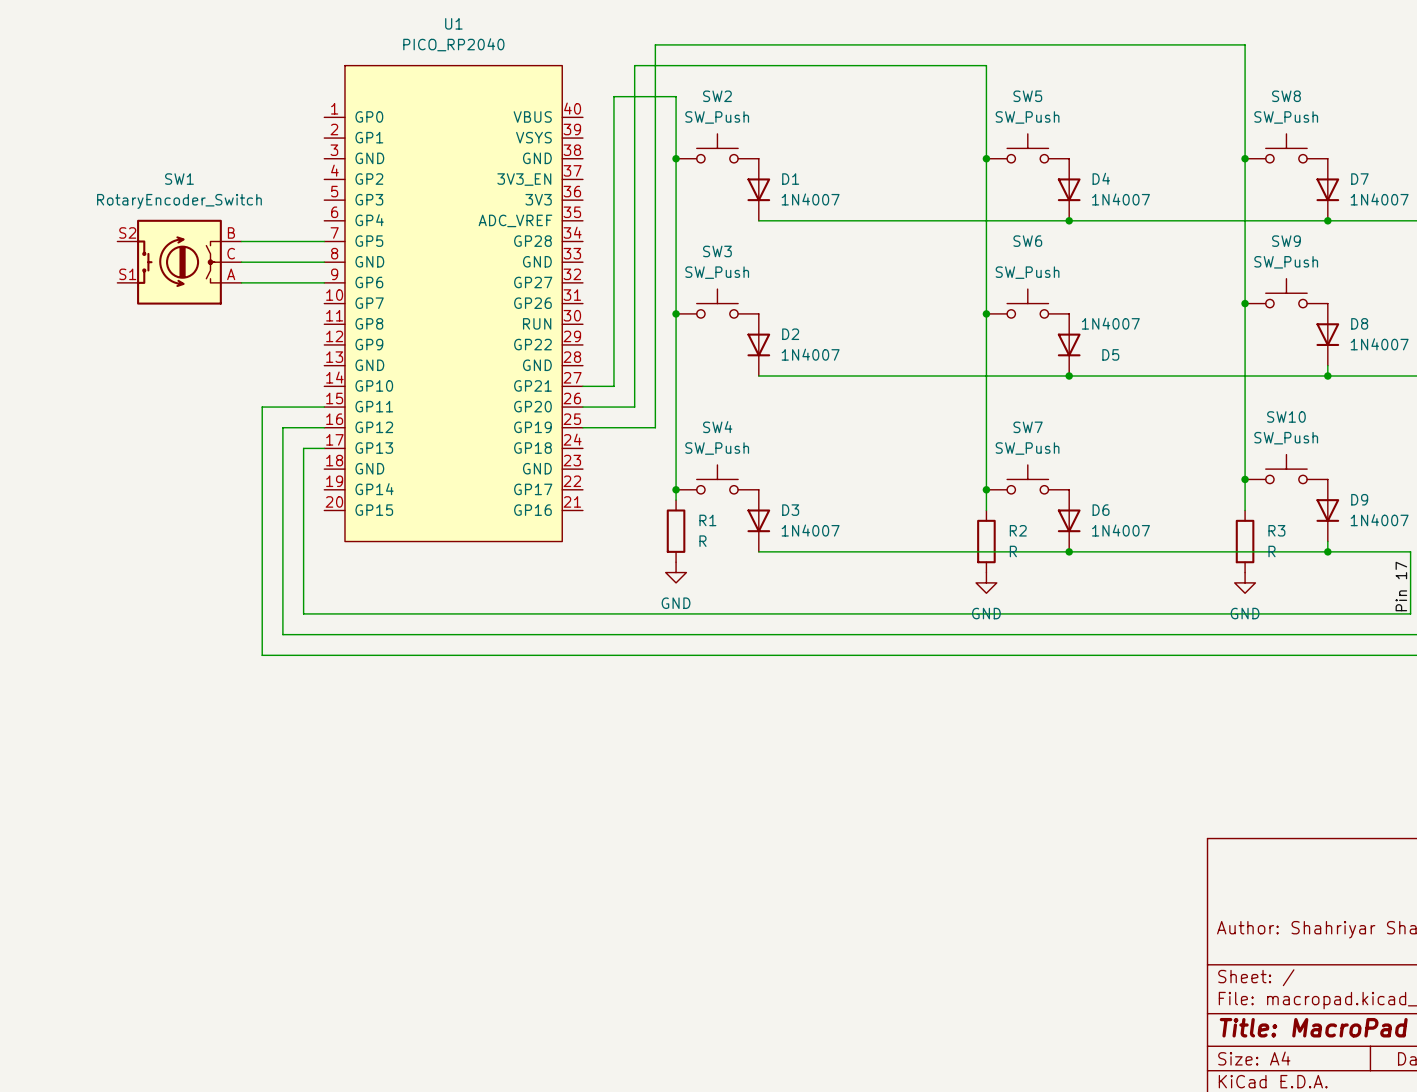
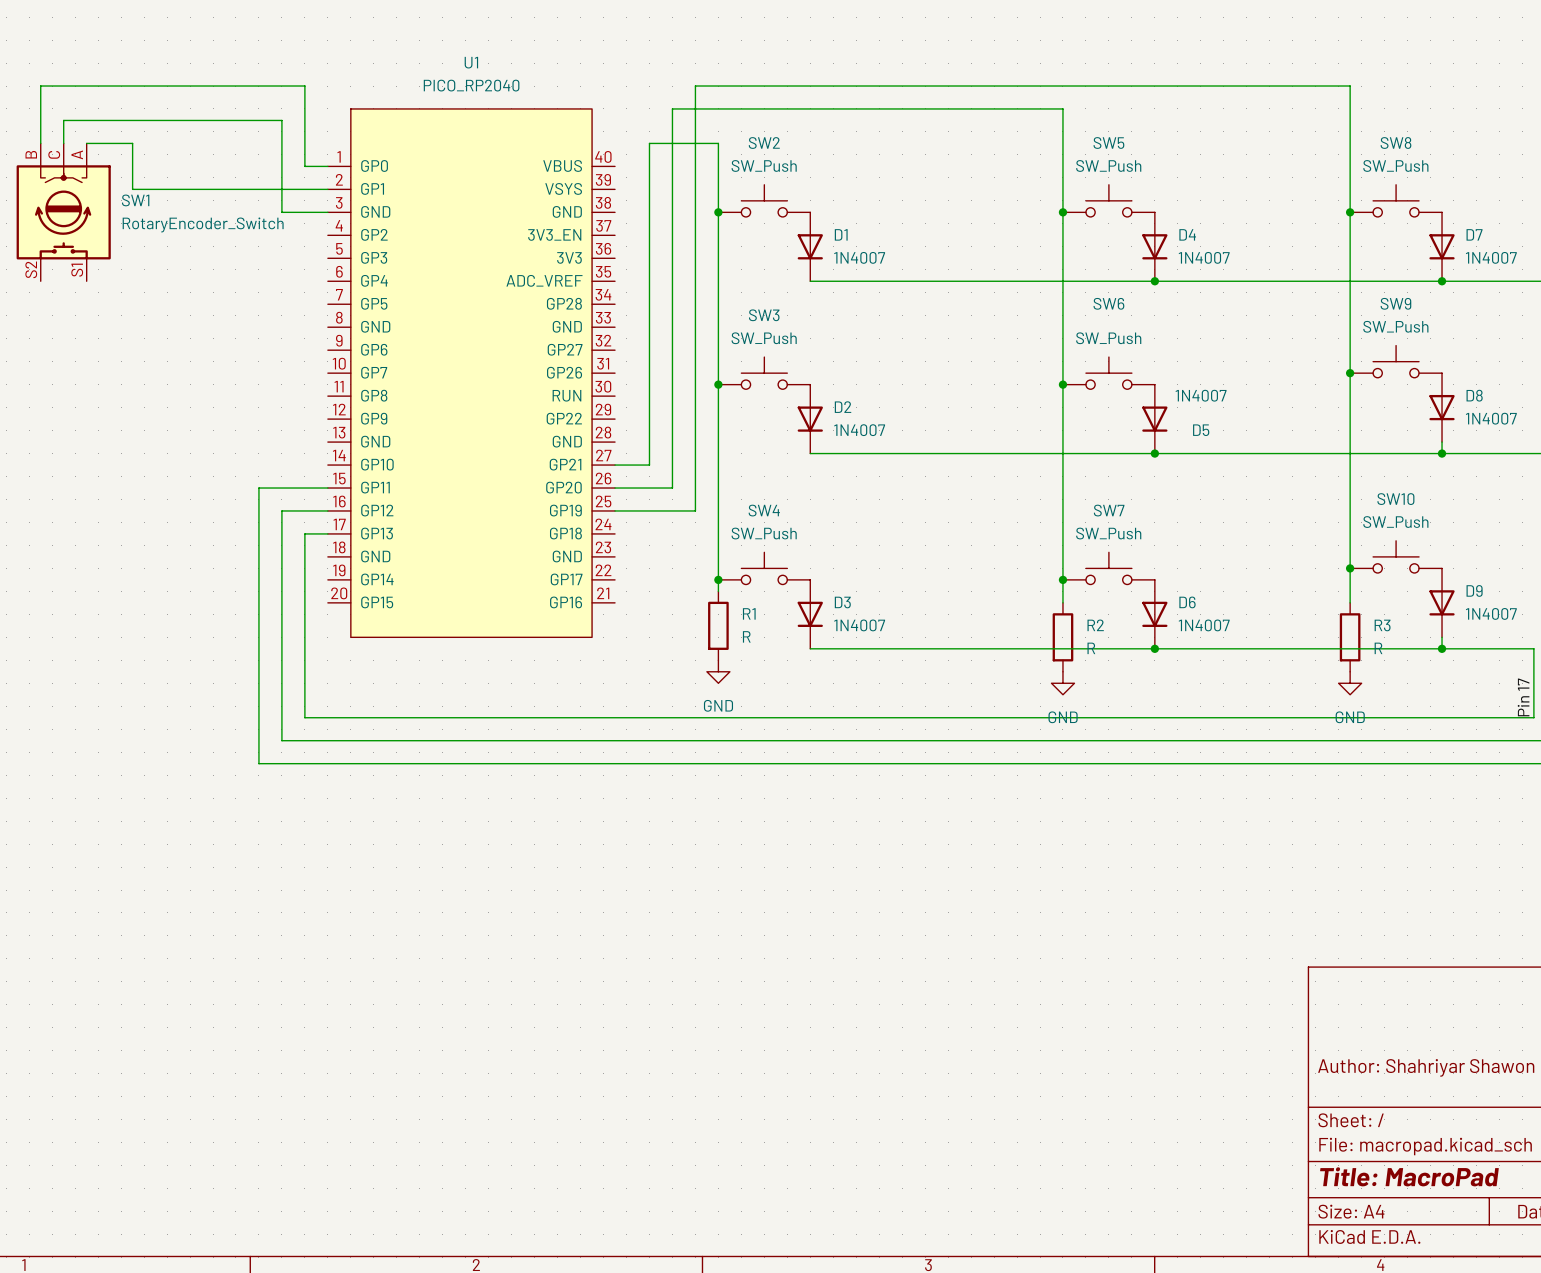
wire: none -> (40, 143) (40, 86) (304, 86) (304, 166) (327, 166)
wire: none -> (63, 143) (63, 120) (281, 120) (281, 212) (327, 212)
wire: none -> (86, 143) (132, 143) (132, 189) (327, 189)
SW1 name position: SW1 (179, 179) -> SW1 (135, 200)
SW1 value position: RotaryEncoder_Switch (179, 201) -> RotaryEncoder_Switch (203, 224)
wire: (241, 241) (324, 241) -> none
SW1 rotation: 0° (179, 262) -> 90° counterclockwise (63, 212)
SW1 position: (179, 262) -> (63, 212)
wire: (241, 262) (324, 262) -> none
wire: (241, 282) (324, 282) -> none

